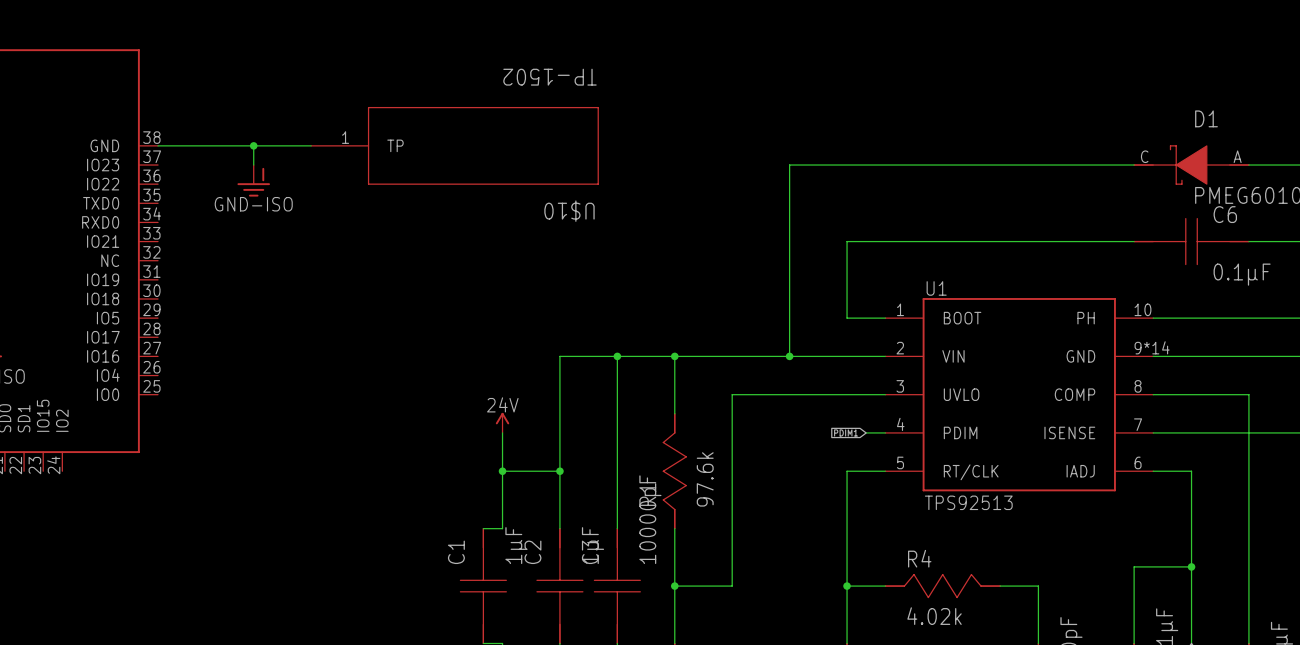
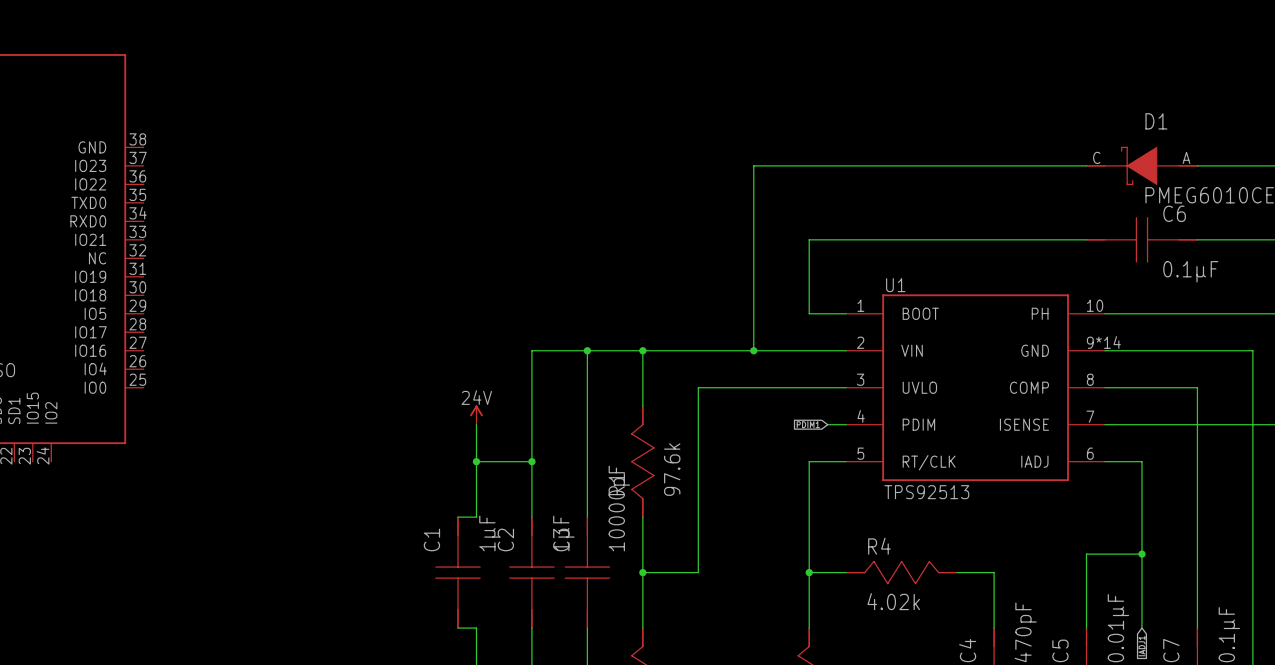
wire: (158, 145) (311, 145) -> none
wire: (253, 145) (253, 165) -> none
junction: (253, 145) -> none
U$10: TP-1502 (454, 145) -> none
power symbol: GND-ISO (253, 180) -> none

